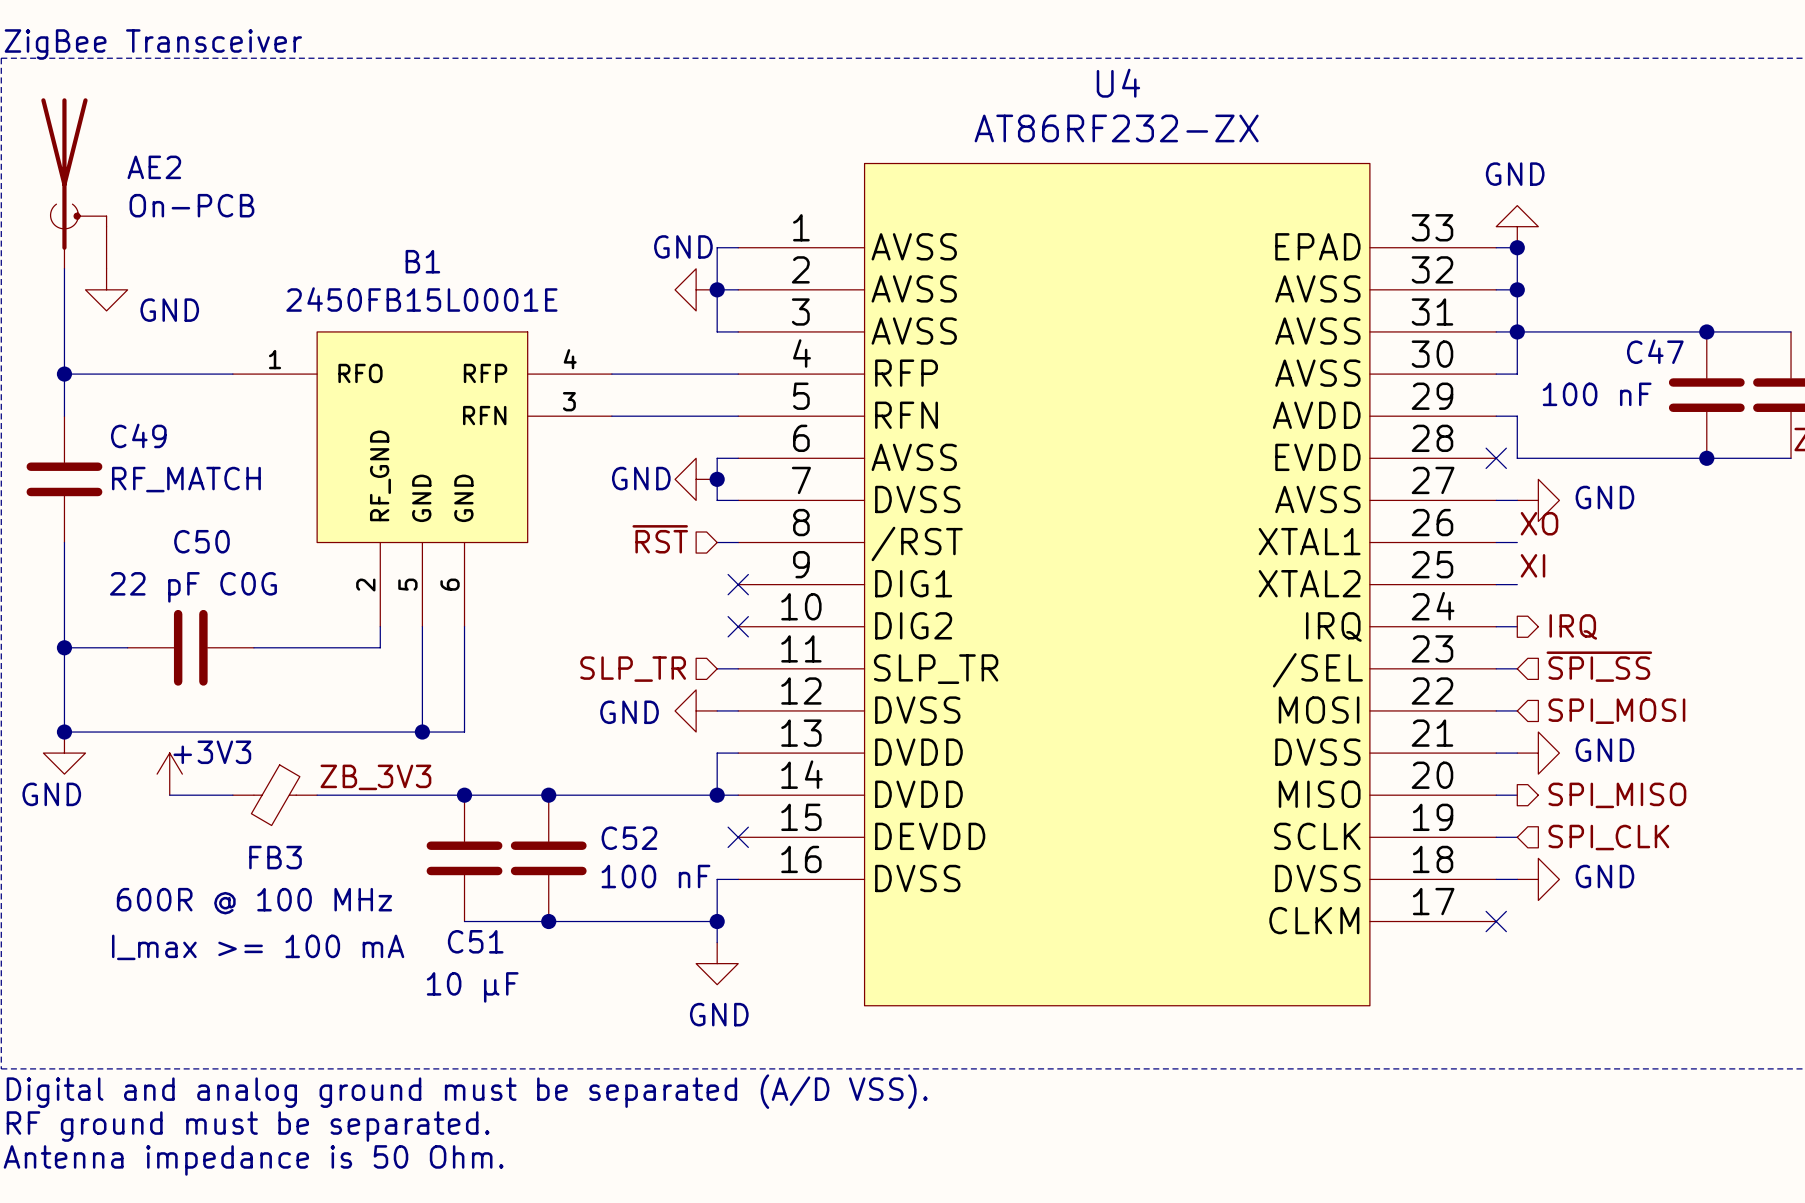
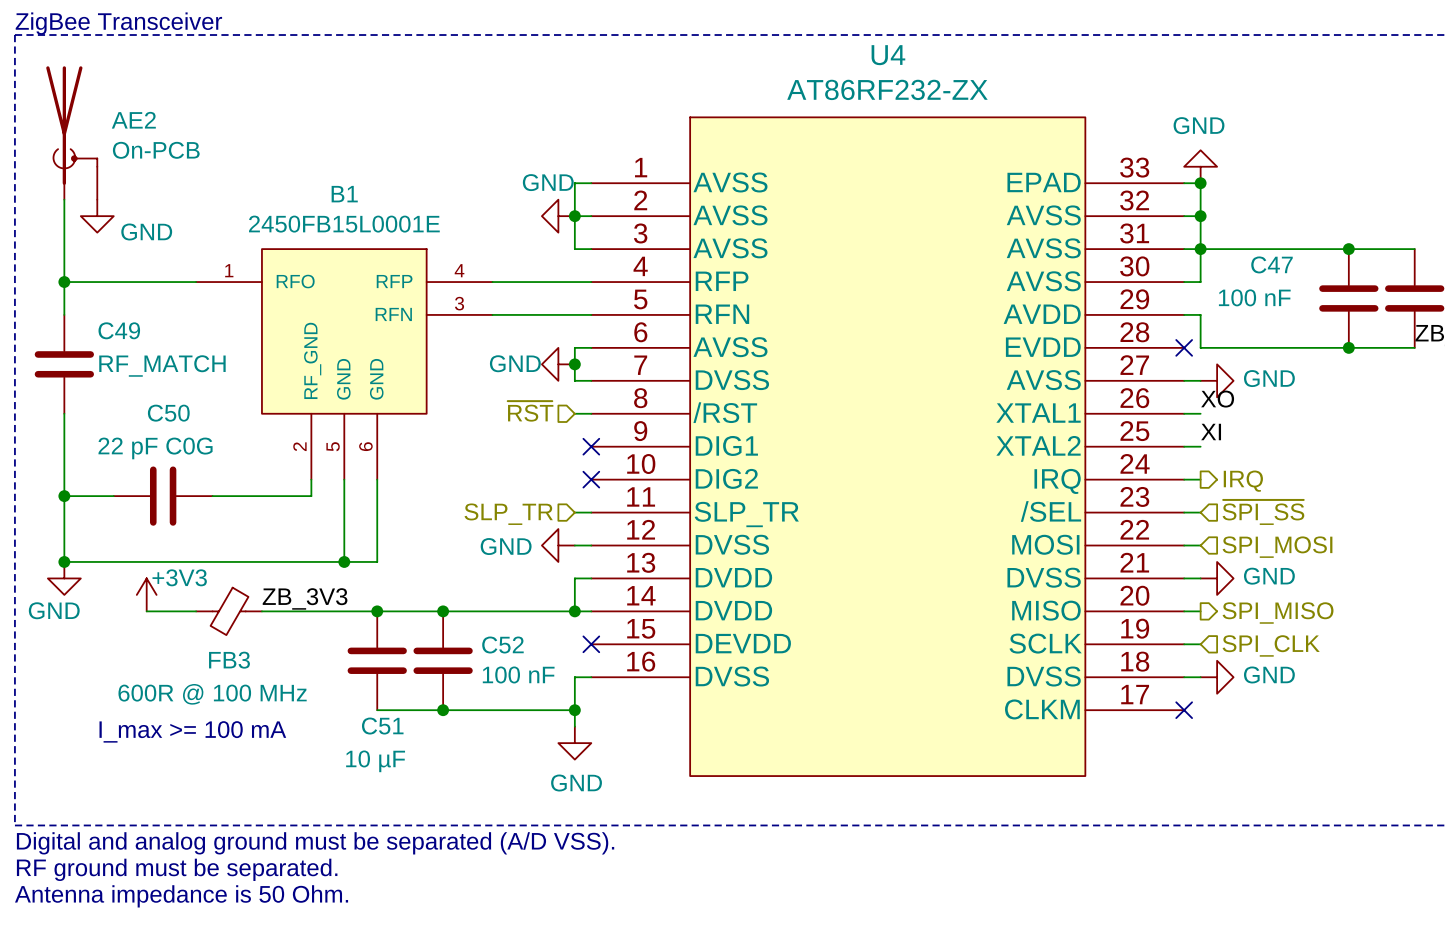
C47 name position: C47 (1655, 351) -> C47 (1271, 264)

